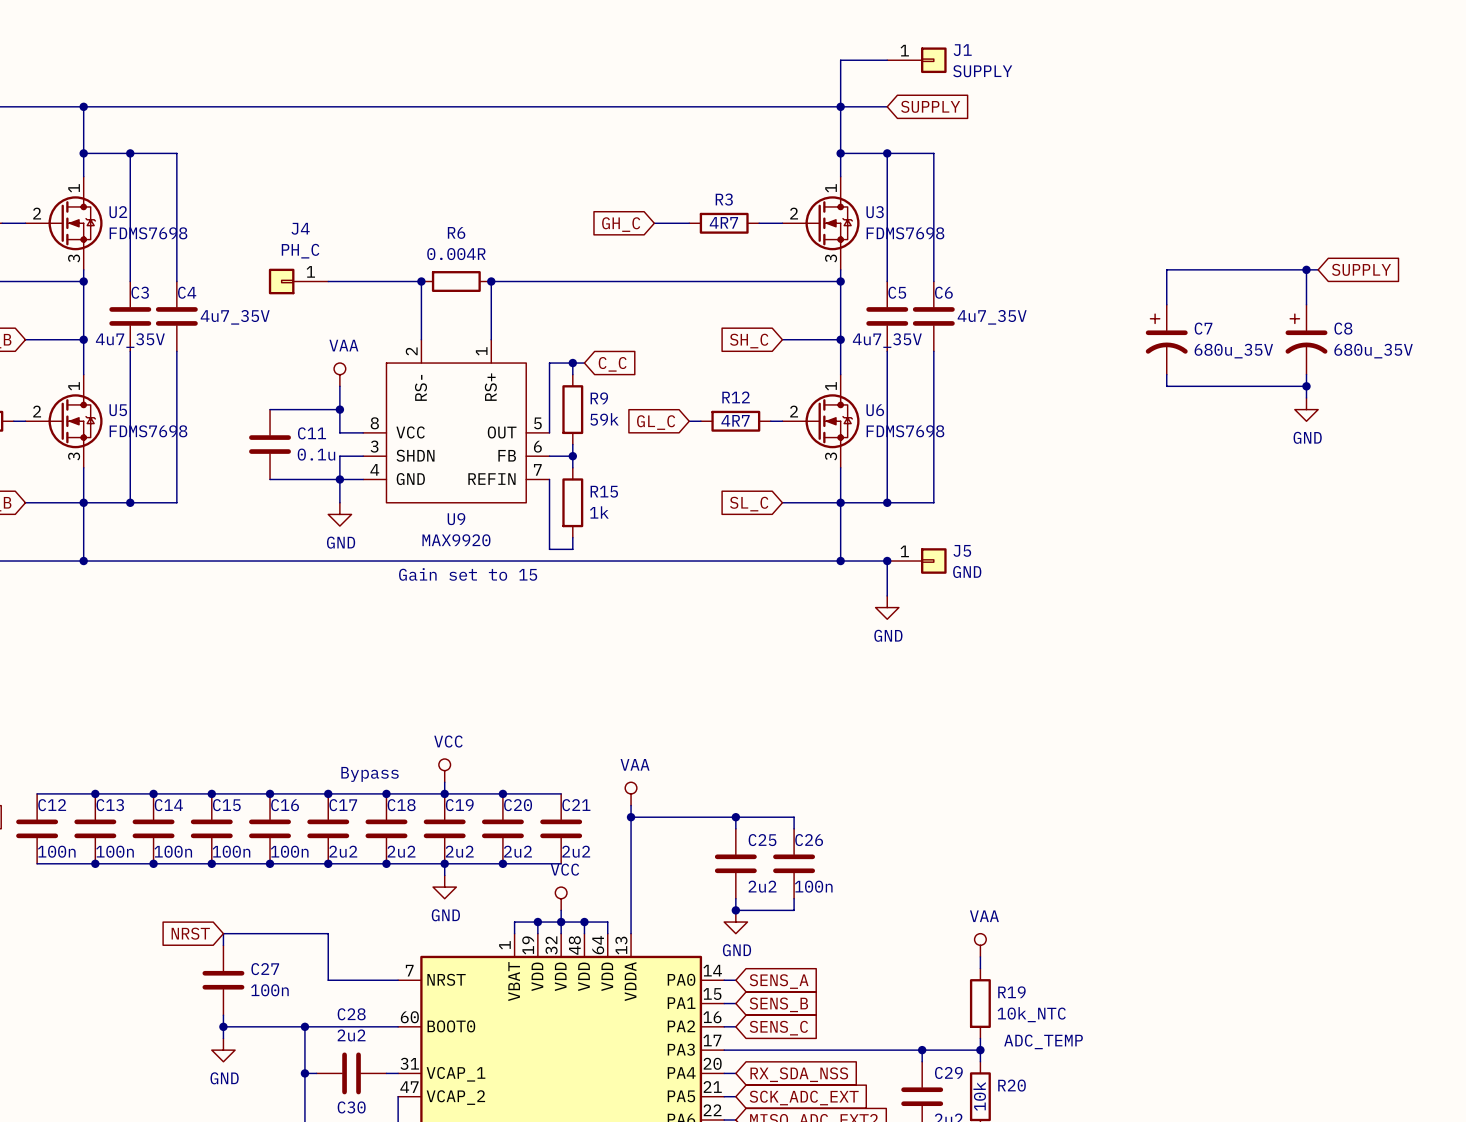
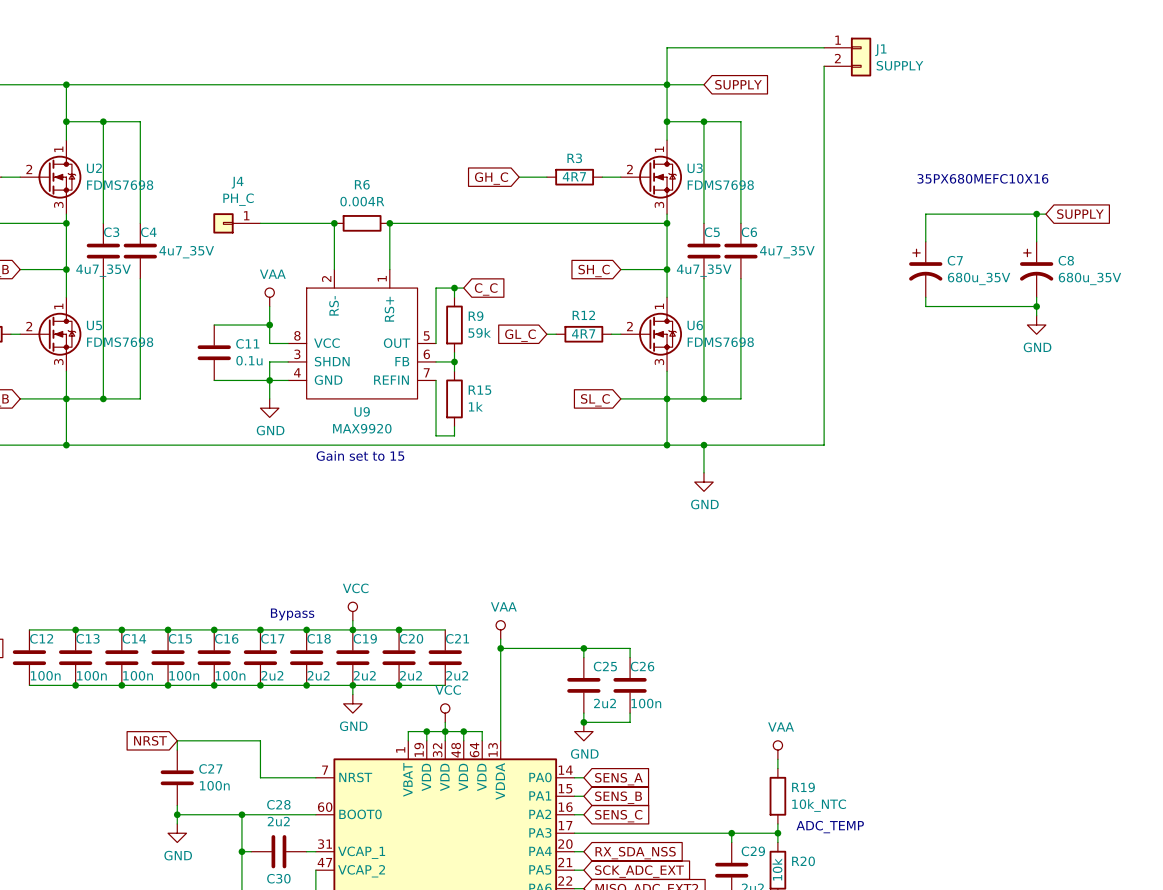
J1 symbol: [887, 47, 947, 74] -> [824, 37, 872, 77]
wire: none -> (703, 47) (824, 47)
wire: none -> (824, 66) (824, 445) (703, 445)
text: none -> 35PX680MEFC10X16 (982, 178)
J5: GND (916, 561) -> none

